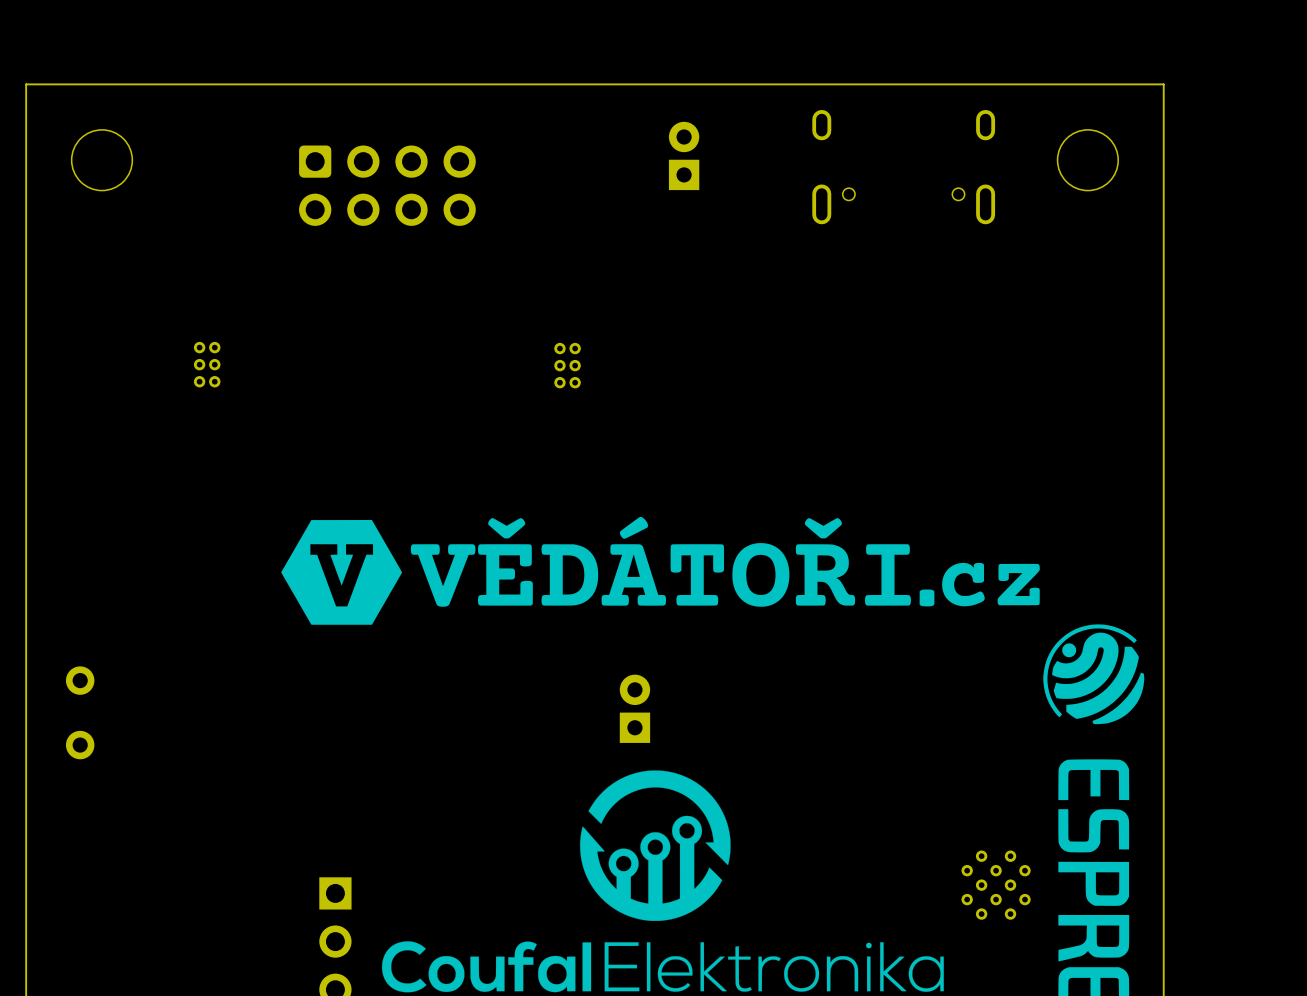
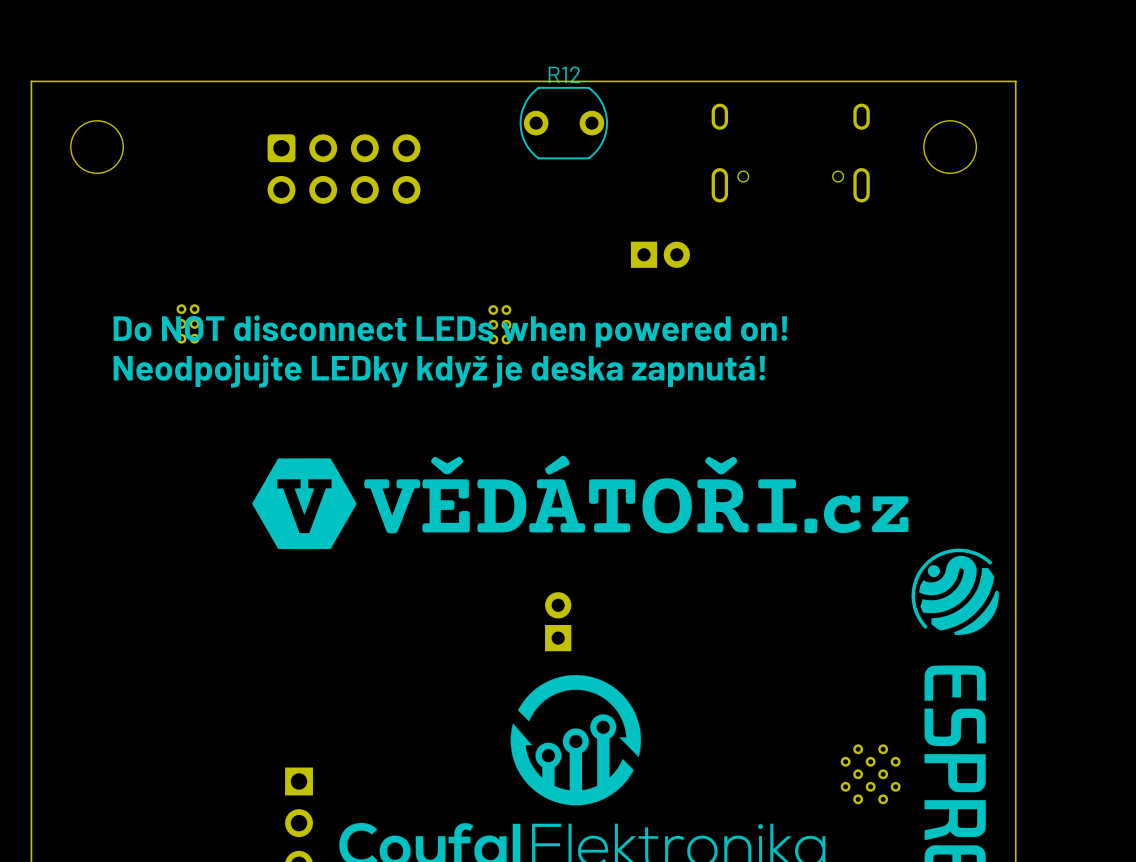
R12: none -> (563, 122)
part rotation: 0° (684, 155) -> 90° clockwise (660, 254)
part position: (684, 155) -> (660, 254)
text: none -> Do NOT disconnect LEDs when powered on! (450, 331)
text: none -> Neodpojujte LEDky když je deska zapnutá! (439, 371)
part: (80, 712) -> none

